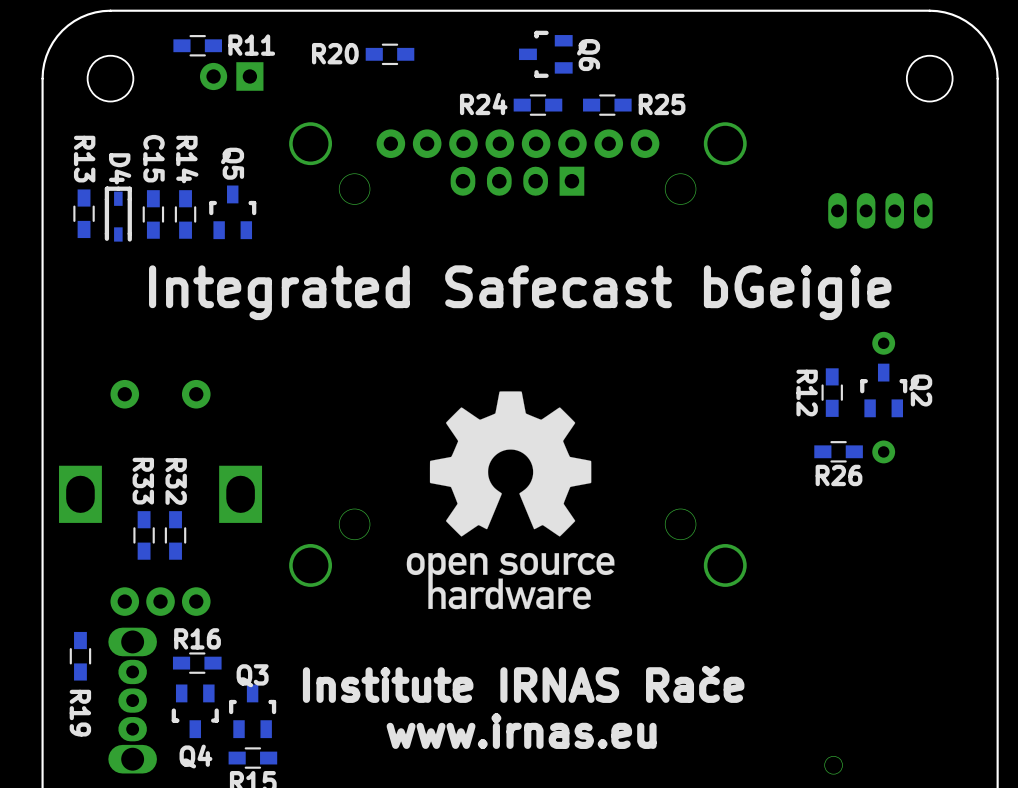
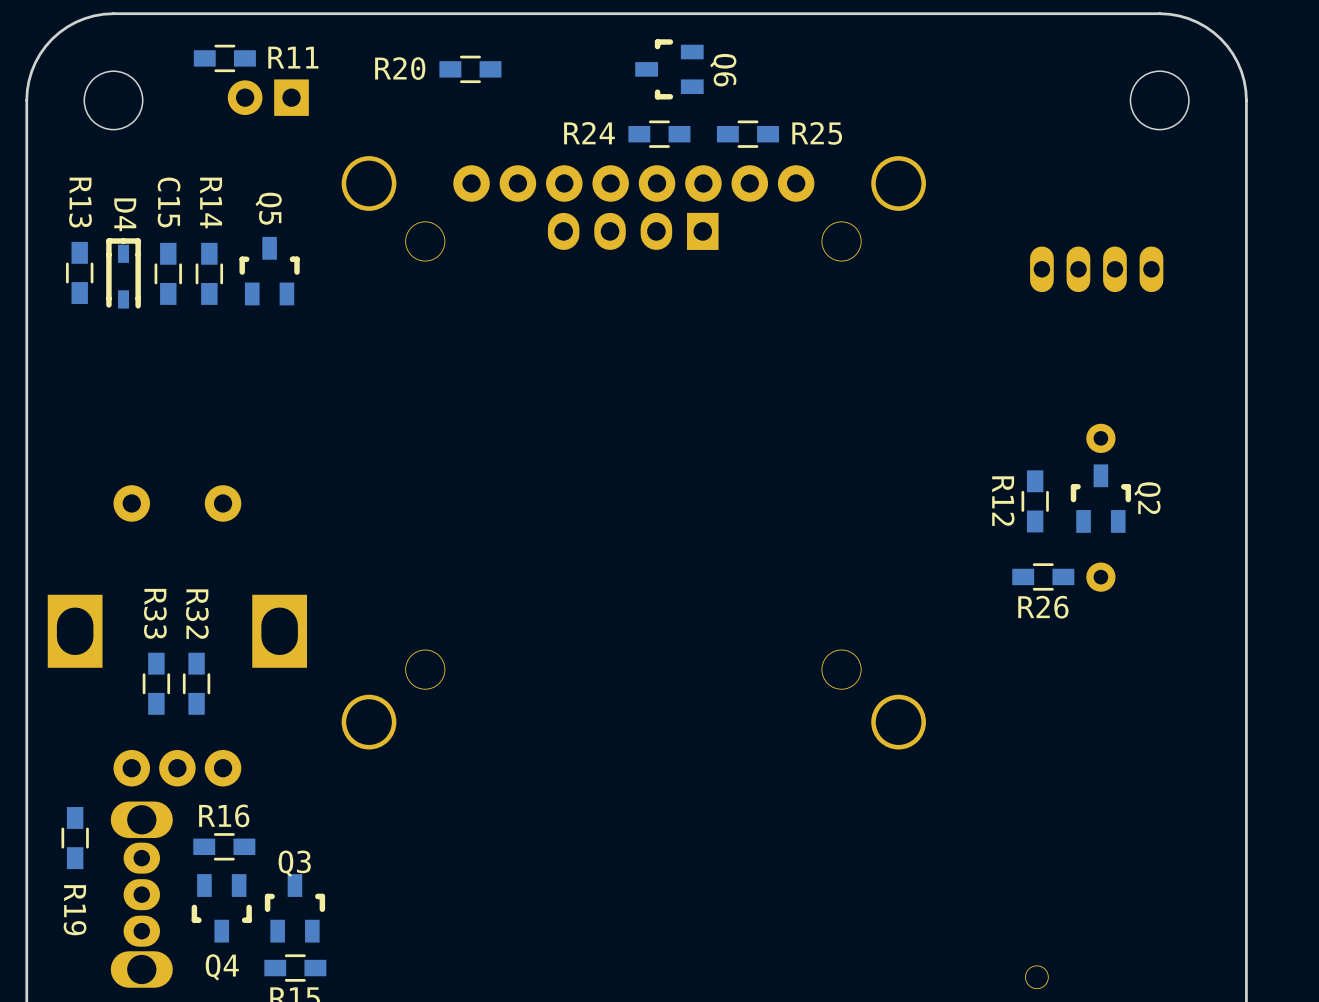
text: Integrated Safecast bGeigie (520, 292) -> none
drawing: [406, 391, 615, 610] -> none
text: Institute IRNAS Rače (523, 684) -> none
text: www.irnas.eu (521, 731) -> none

